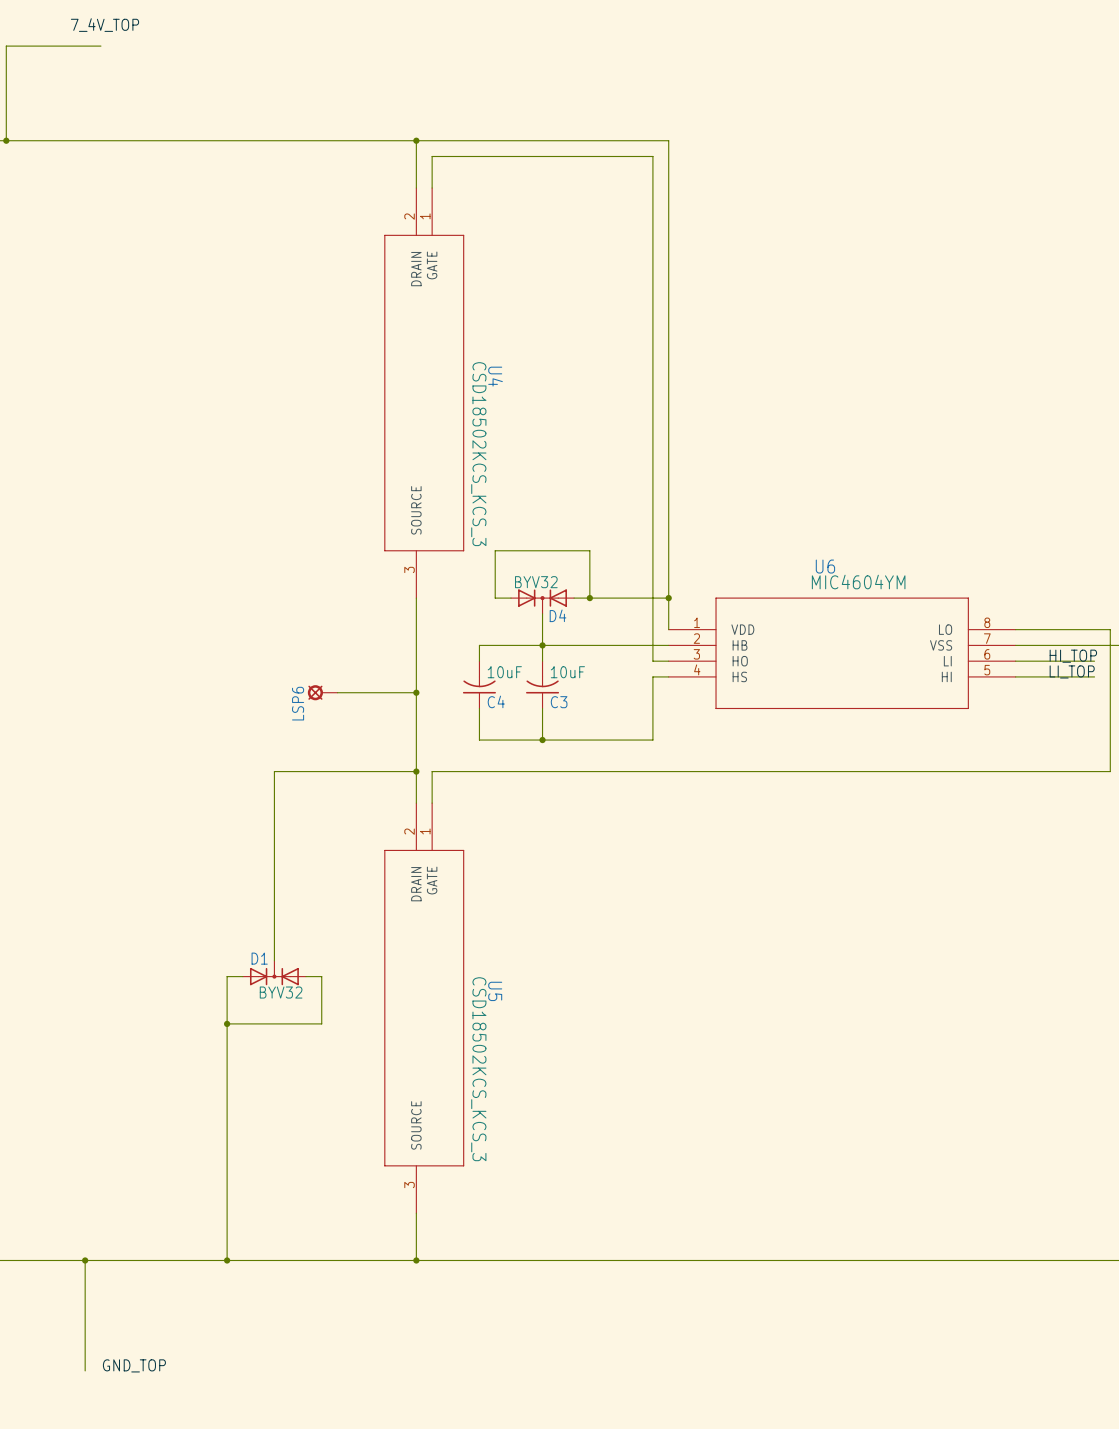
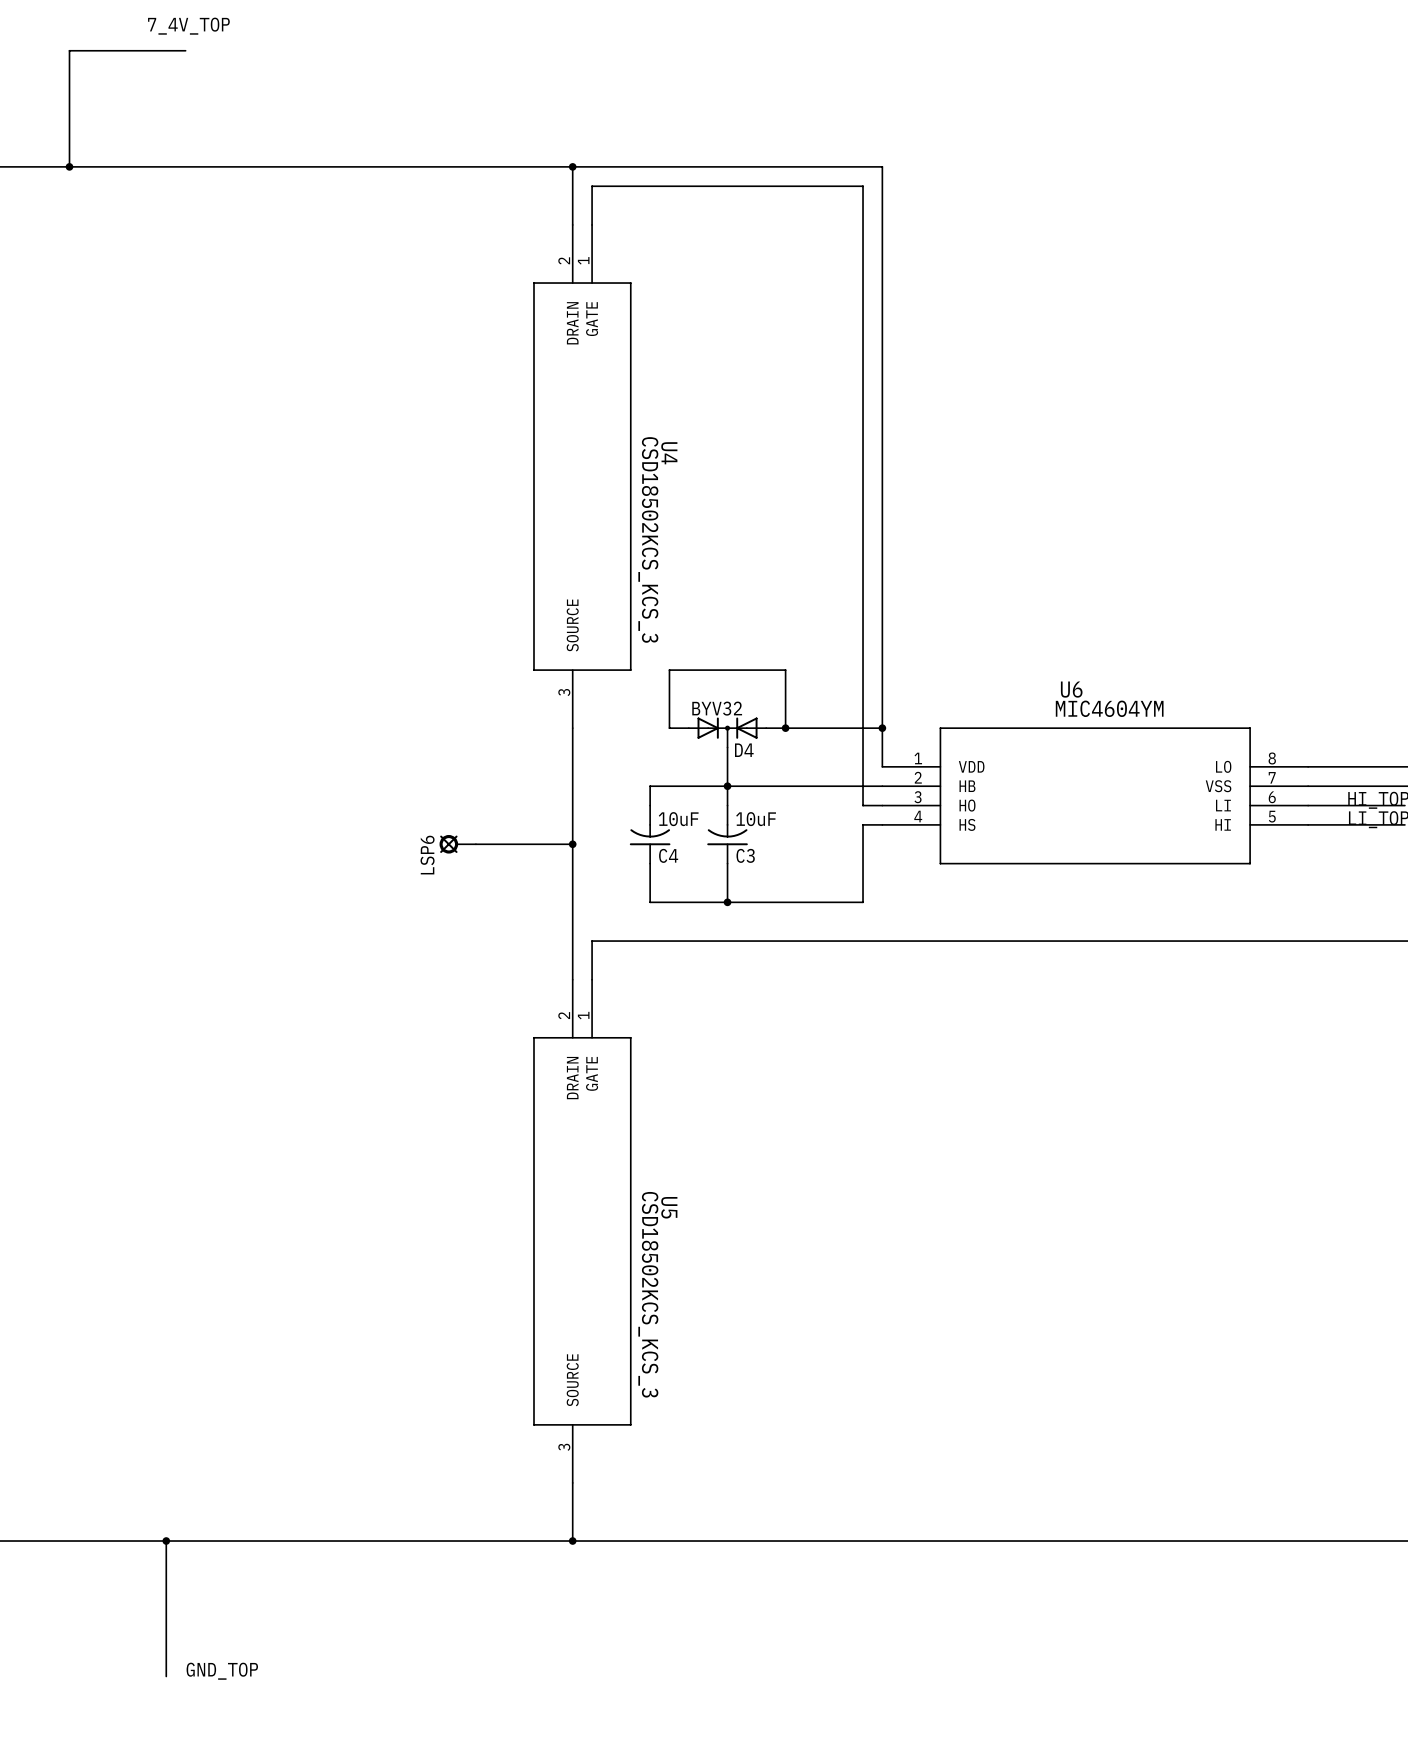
wire: (416, 771) (274, 771) (274, 960) -> none
junction: (416, 771) -> none
D1: BYV32 (274, 973) -> none
wire: (242, 976) (227, 976) (227, 1260) -> none
wire: (305, 976) (321, 976) (321, 1023) (227, 1023) -> none
junction: (227, 1023) -> none
junction: (227, 1260) -> none

